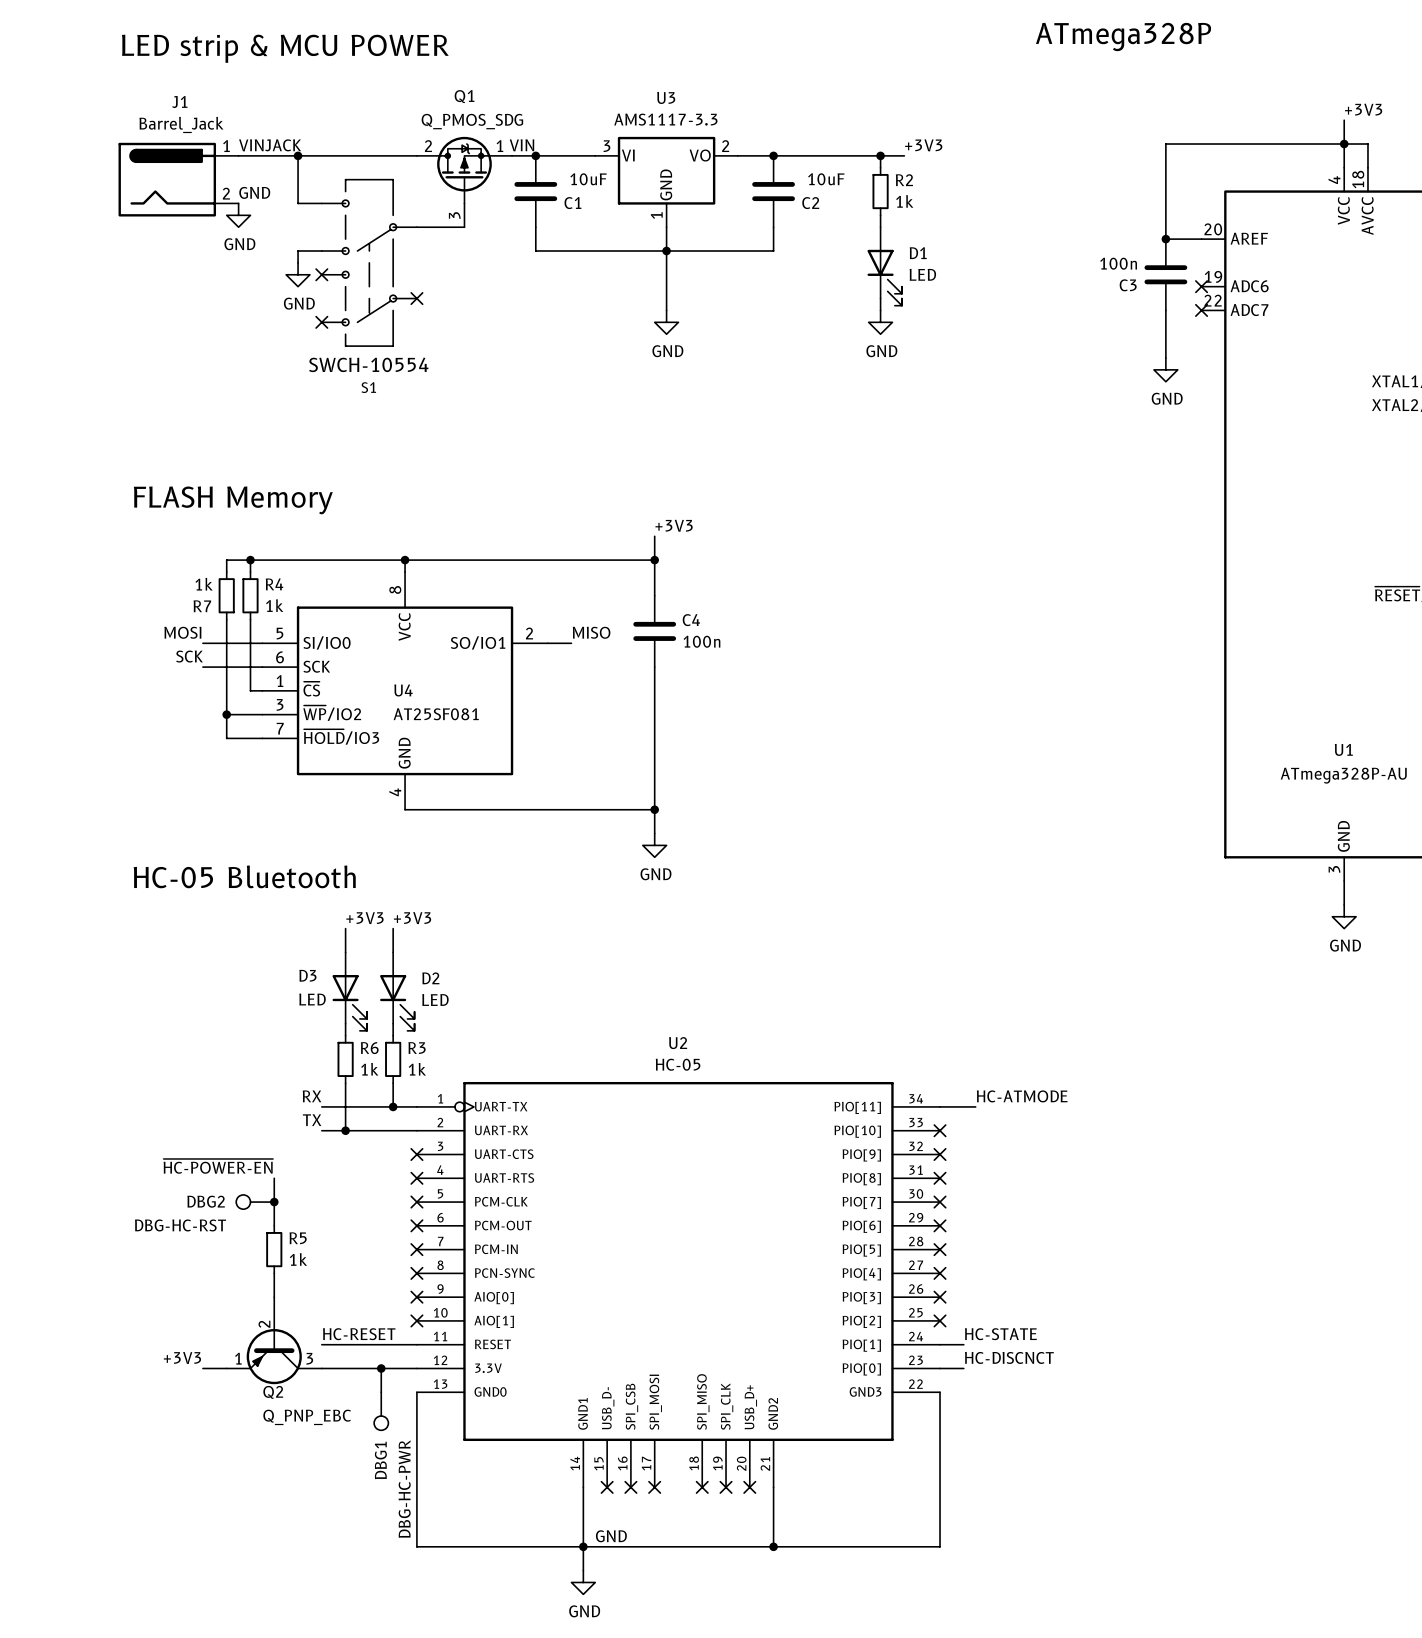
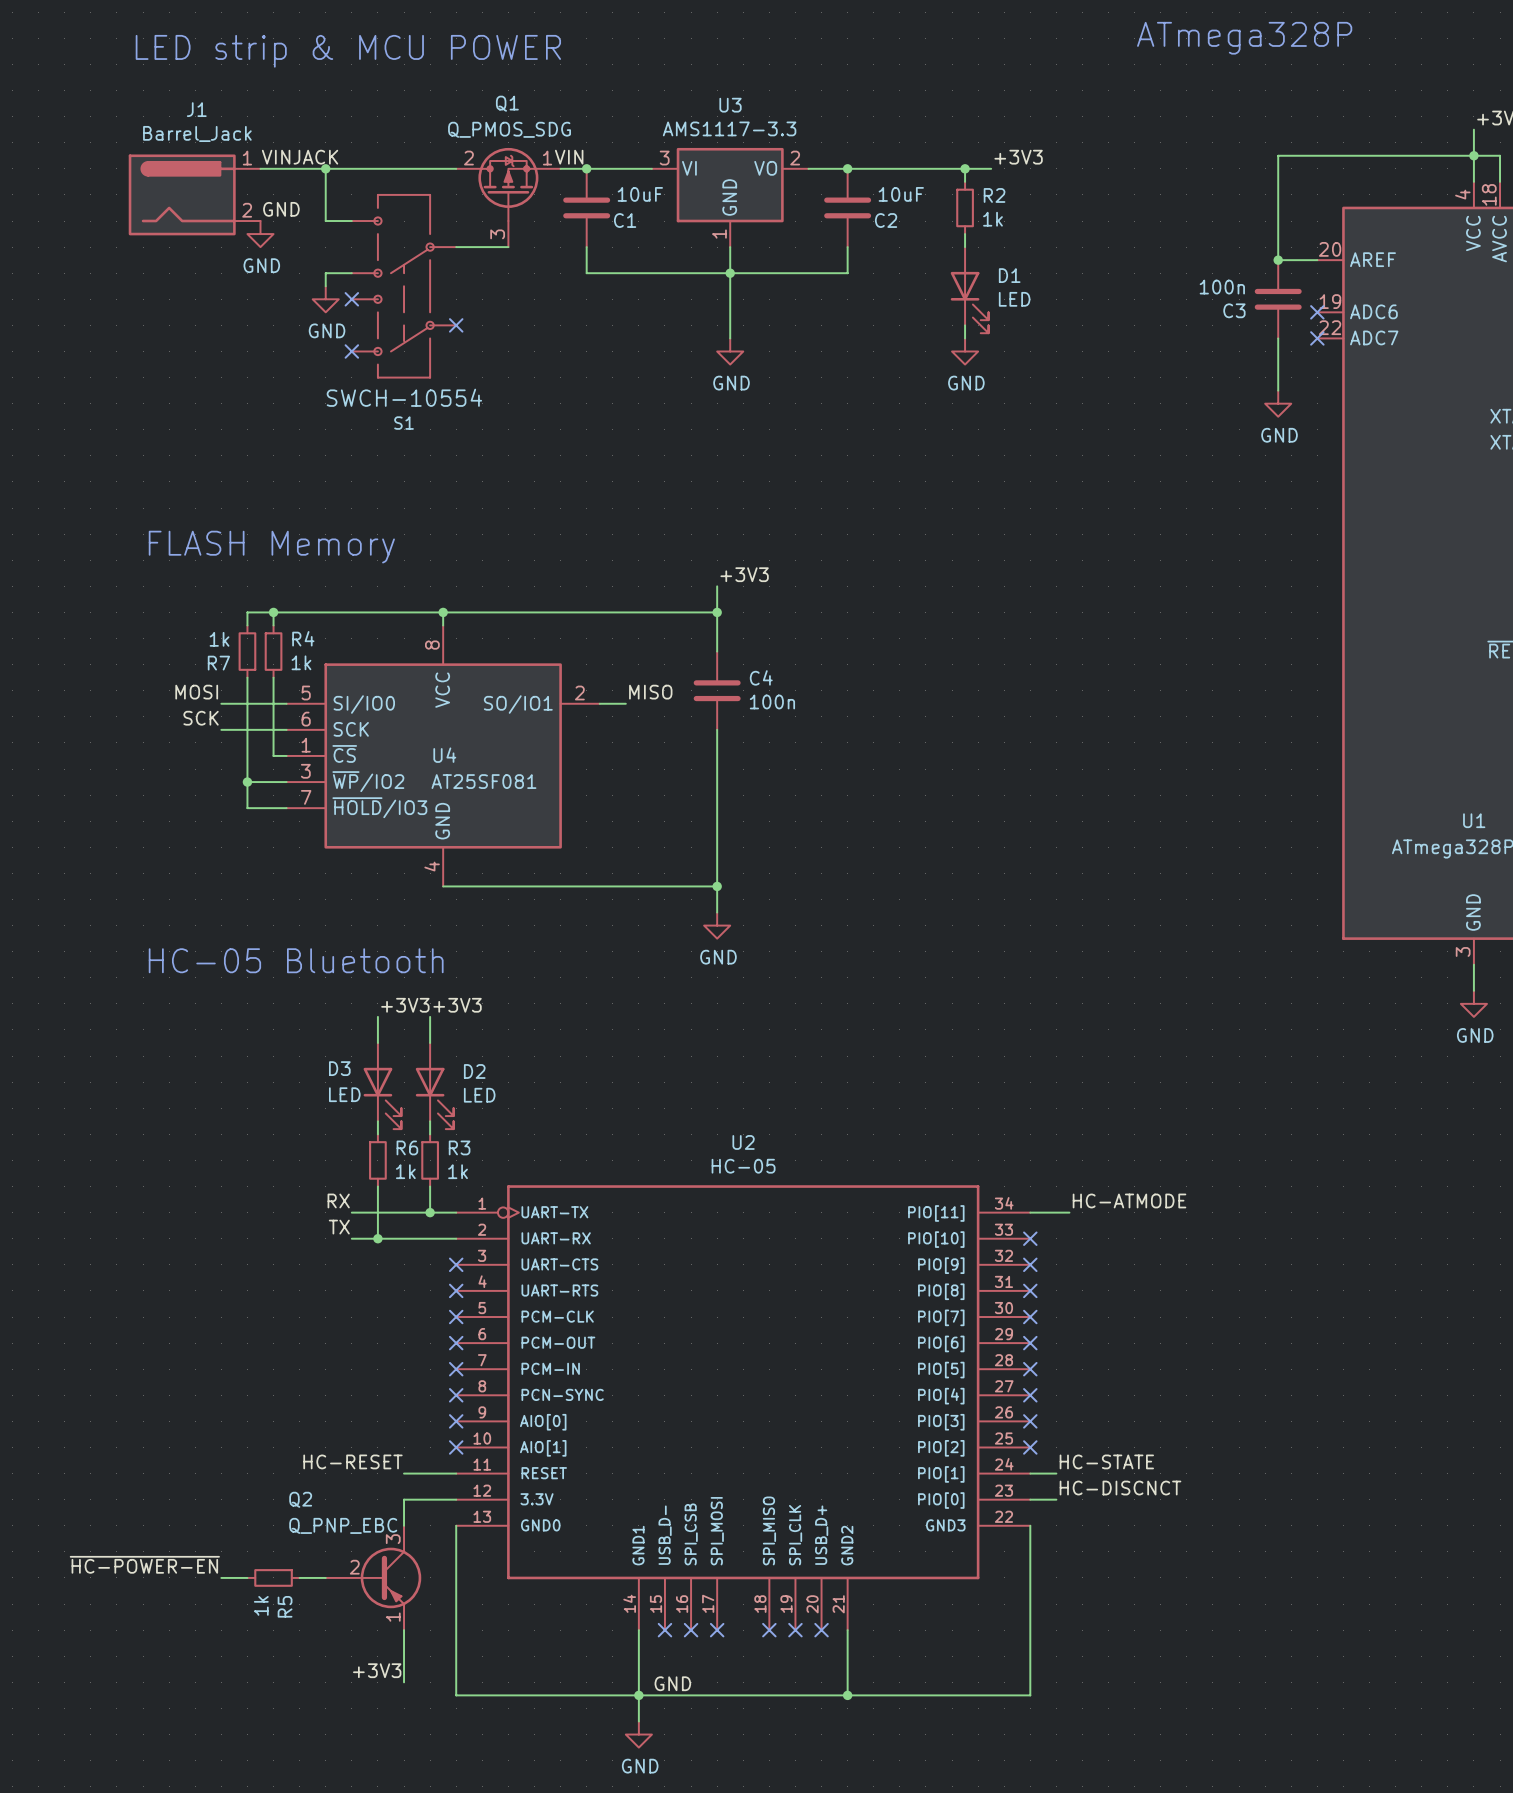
label: ~{HC-POWER-EN} (218, 1166) -> none
wire: (274, 1178) (274, 1225) -> none
DBG2: DBG-HC-RST (255, 1202) -> none
junction: (274, 1202) -> none
R5 rotation: 0° (274, 1249) -> 90° clockwise (273, 1577)
R5 position: (274, 1249) -> (273, 1577)
wire: (274, 1273) (274, 1297) -> none
label position: HC-RESET (359, 1334) -> HC-RESET (352, 1461)
Q2 position: (274, 1340) -> (373, 1577)
wire: (321, 1344) (369, 1344) -> none
Q2 rotation: 0° (274, 1356) -> 90° counterclockwise (390, 1577)
label: +3V3 (182, 1357) -> none
wire: (202, 1368) (226, 1368) -> (221, 1577) (247, 1577)
wire: (321, 1368) (369, 1368) -> (404, 1525) (404, 1499)
wire: (381, 1368) (381, 1392) -> none
junction: (381, 1368) -> none
Q2 name position: Q2 (273, 1392) -> Q2 (300, 1499)
DBG1: DBG-HC-PWR (381, 1411) -> none
Q2 value position: Q_PNP_EBC (307, 1417) -> Q_PNP_EBC (343, 1525)
label: none -> ~{HC-POWER-EN} (144, 1564)
wire: none -> (299, 1577) (325, 1577)
wire: none -> (404, 1630) (404, 1682)
label: none -> +3V3 (377, 1670)

